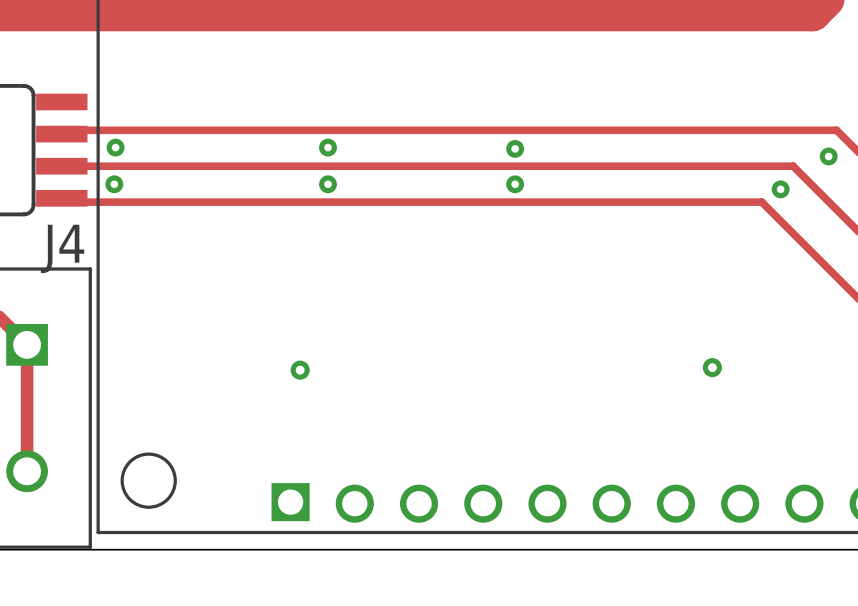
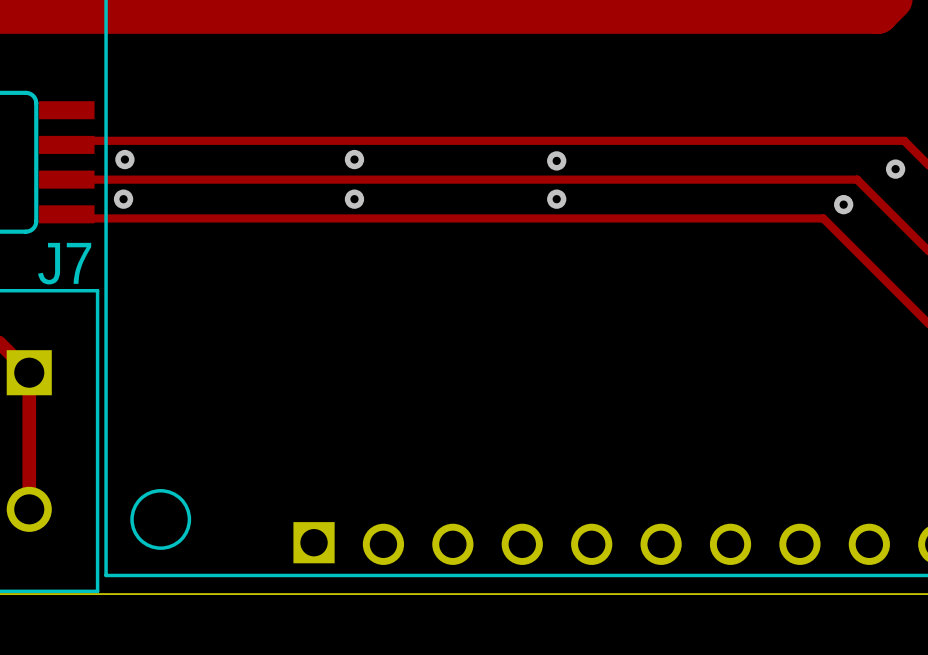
J4 name: J4 (62, 248) -> J7 (64, 263)
via: (712, 367) -> none
via: (300, 370) -> none

